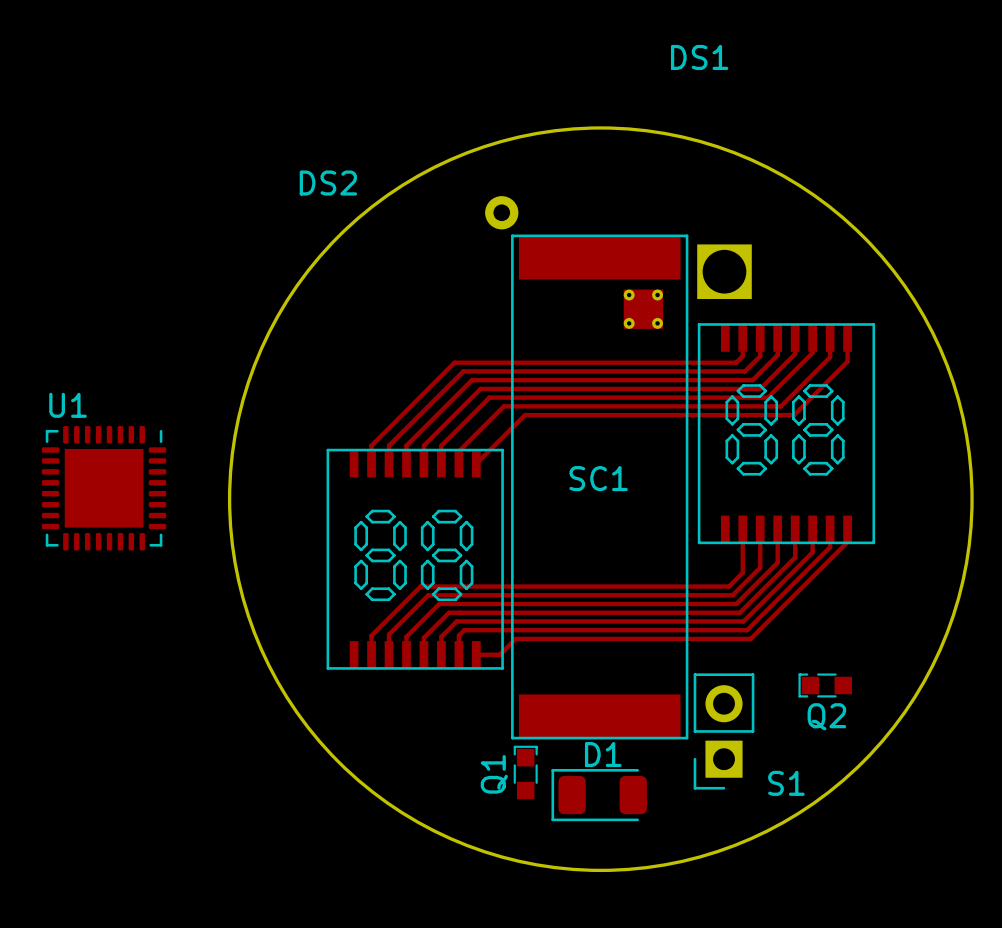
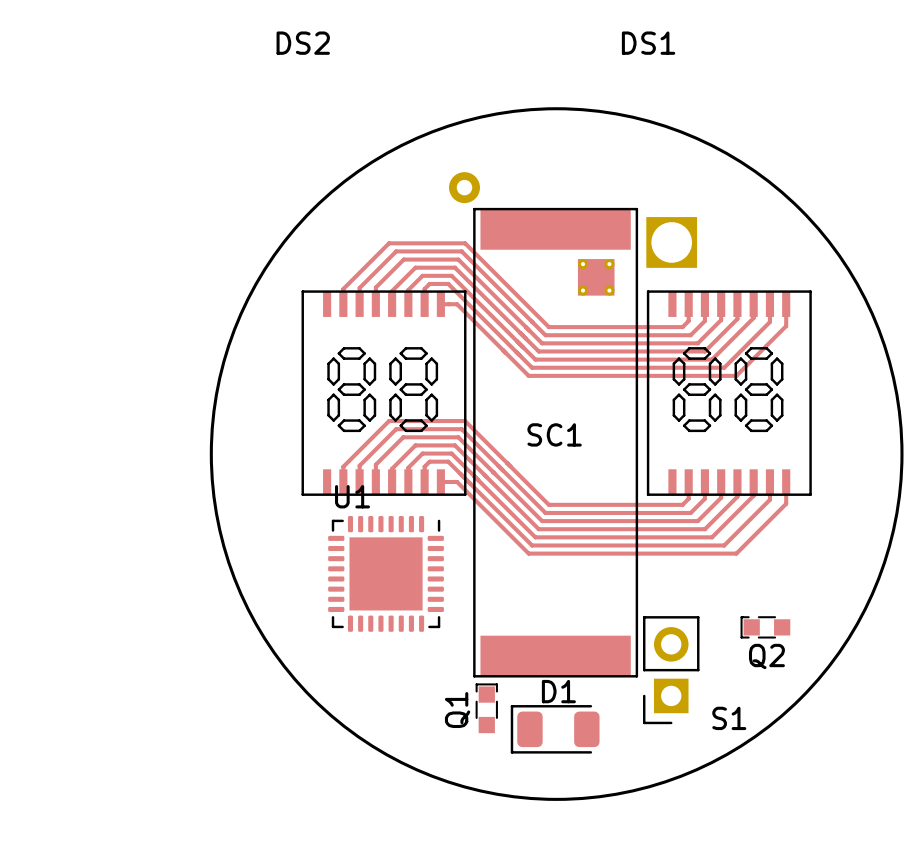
track: (592, 362) (454, 362) (371, 445) (371, 463) -> (548, 327) (465, 243) (389, 243) (343, 289) (343, 304)
track: (588, 371) (463, 371) (389, 445) (389, 463) -> (545, 335) (461, 251) (396, 251) (359, 288) (359, 304)
track: (585, 380) (471, 380) (406, 445) (406, 463) -> (542, 343) (458, 259) (403, 259) (375, 287) (375, 304)
track: (581, 388) (480, 388) (423, 445) (423, 463) -> (538, 351) (455, 267) (415, 267) (392, 291) (392, 304)
track: (578, 397) (489, 397) (441, 445) (441, 463) -> (535, 359) (451, 275) (422, 275) (408, 290) (408, 304)
track: (574, 406) (503, 406) (458, 451) (458, 463) -> (532, 367) (448, 283) (429, 283) (424, 289) (424, 304)
track: (570, 415) (524, 415) (476, 463) -> (528, 375) (457, 304) (440, 305)
U1 position: (104, 488) -> (386, 573)
track: (847, 542) (750, 638) (515, 638) (499, 654) (476, 654) (476, 653) -> (786, 493) (786, 503) (736, 553) (528, 553) (457, 481) (440, 483)
track: (812, 543) (812, 552) (743, 621) (456, 621) (441, 636) (441, 654) -> (753, 495) (712, 537) (535, 537) (451, 453) (422, 453) (408, 467) (408, 481)
track: (795, 545) (795, 557) (739, 612) (449, 612) (423, 637) (423, 654) -> (737, 496) (704, 529) (538, 529) (455, 445) (415, 445) (392, 468) (392, 481)
track: (777, 546) (777, 562) (736, 603) (439, 603) (406, 636) (406, 654) -> (721, 497) (697, 521) (542, 521) (458, 437) (403, 437) (375, 464) (375, 481)
track: (742, 547) (742, 572) (729, 586) (420, 586) (371, 635) (371, 654) -> (688, 498) (682, 504) (548, 504) (465, 421) (389, 421) (343, 466) (343, 481)
track: (760, 547) (760, 567) (732, 595) (428, 595) (389, 634) (389, 654) -> (704, 498) (690, 512) (545, 512) (461, 429) (396, 429) (359, 465) (359, 481)
track: (830, 547) (747, 630) (464, 630) (458, 635) (458, 654) -> (769, 498) (724, 545) (532, 545) (448, 461) (429, 461) (424, 466) (424, 481)
DS2 position: (415, 559) -> (383, 393)

